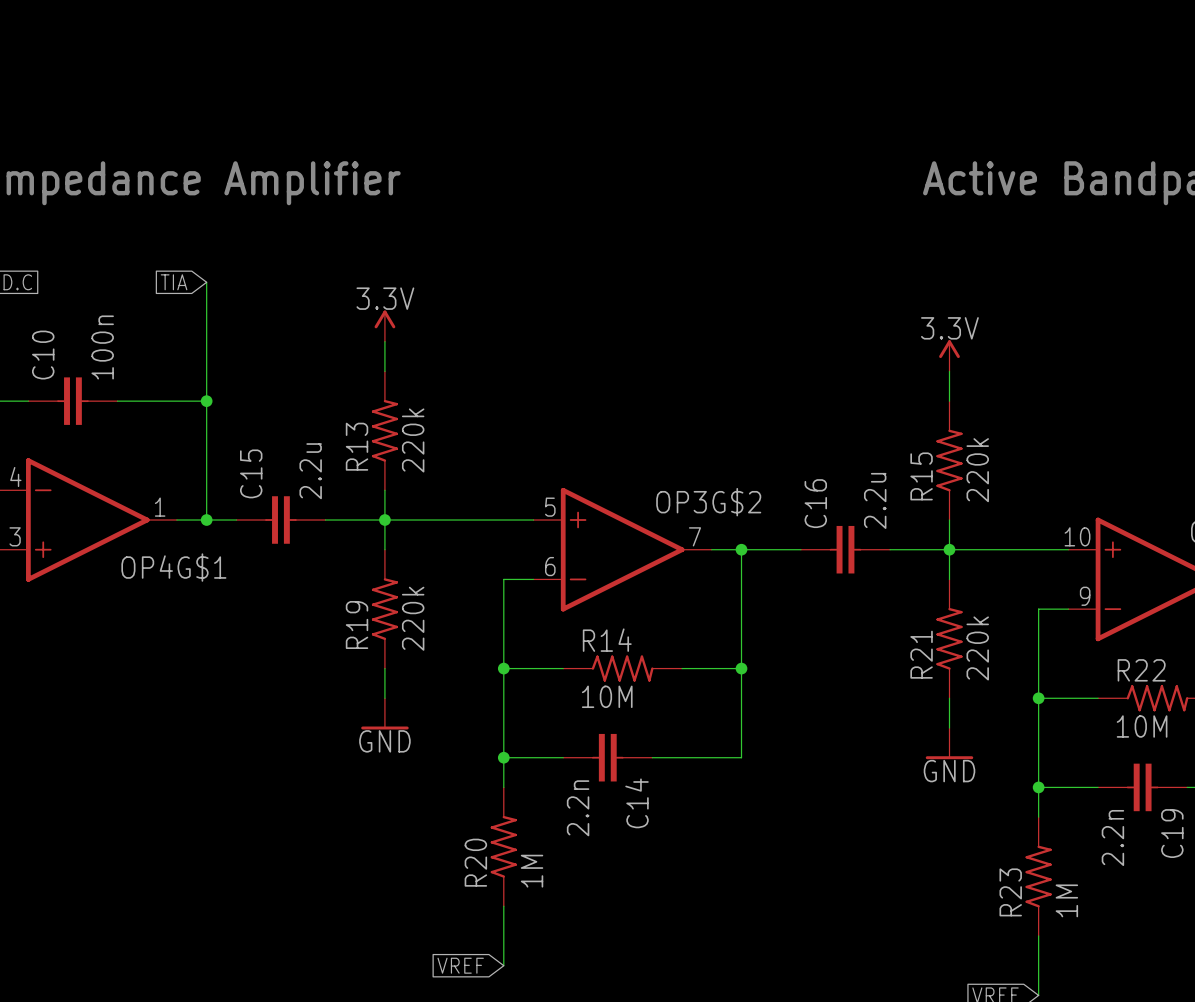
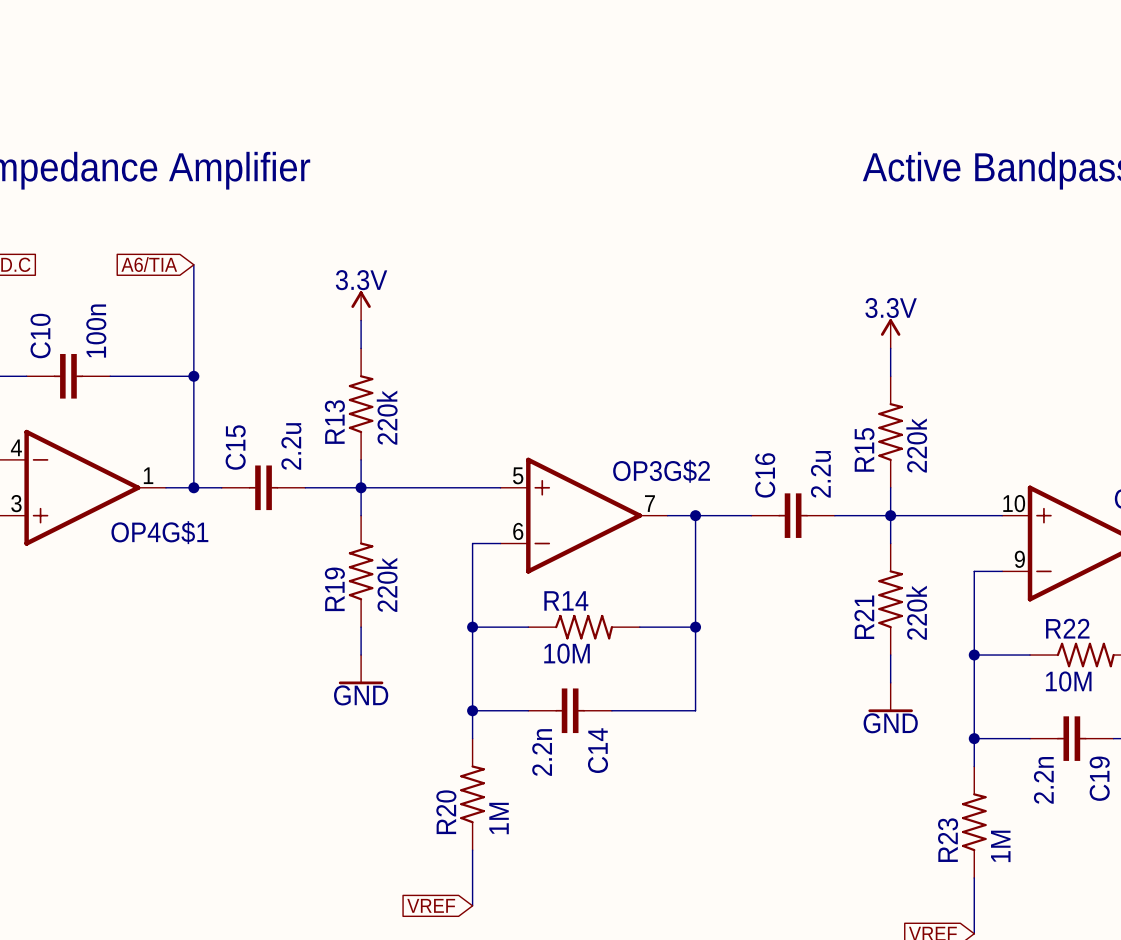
global label: TIA (174, 282) -> A6/TIA (149, 264)

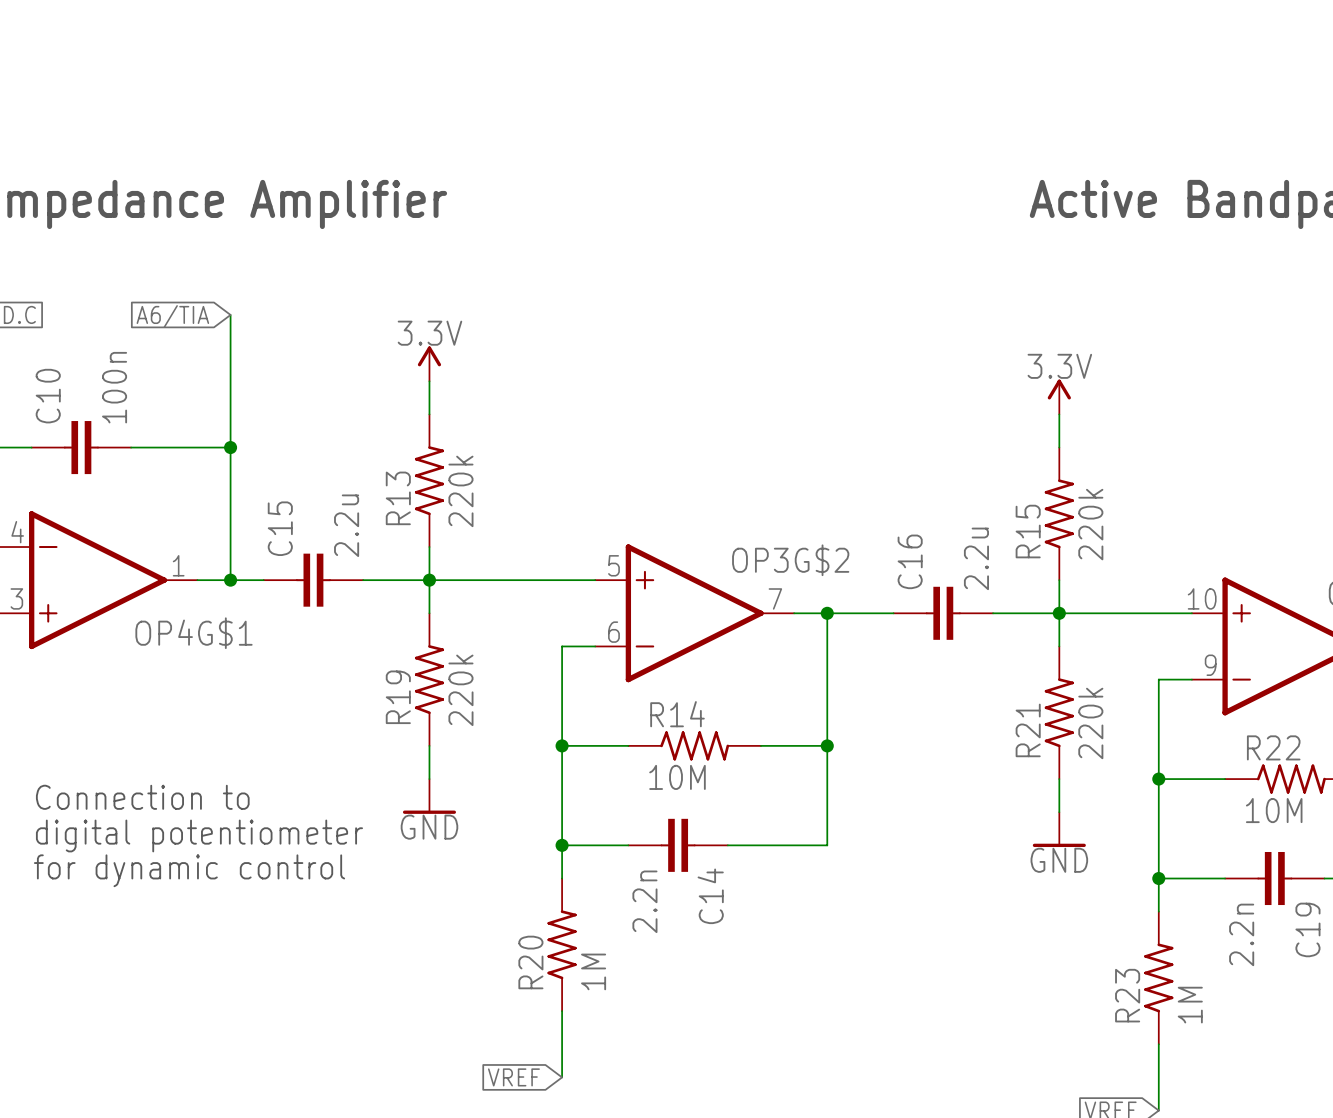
text: none -> Connection to (142, 797)
text: none -> digital potentiometer (199, 835)
text: none -> for dynamic control (189, 870)

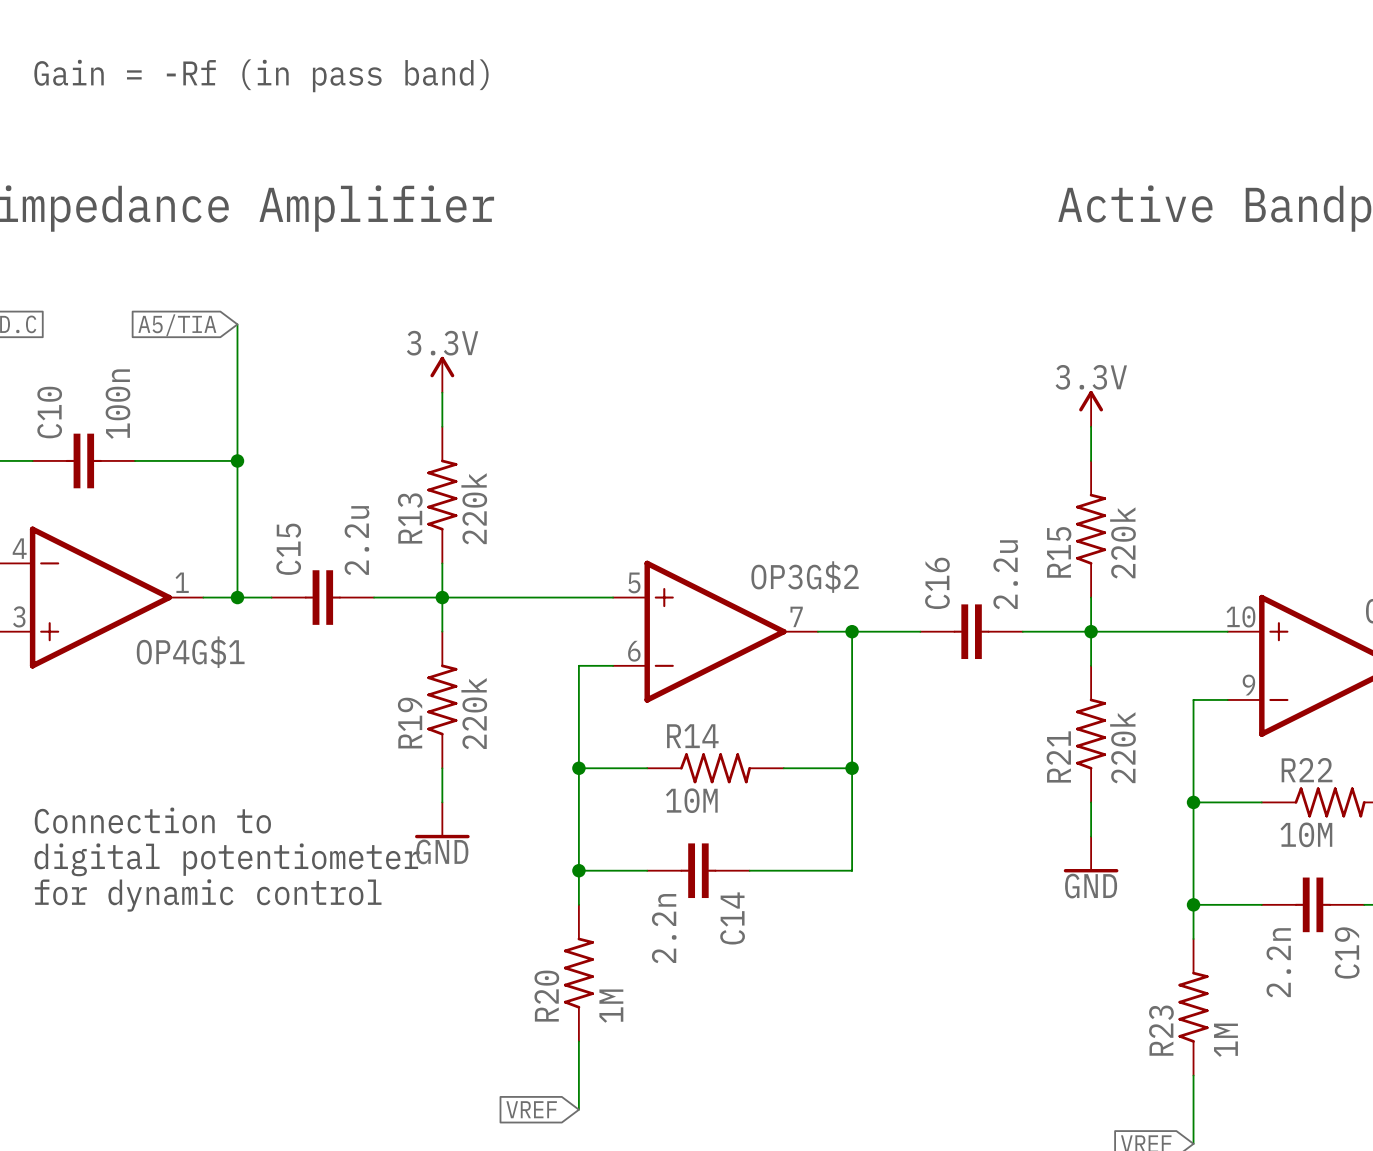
text: none -> Gain = -Rf (in pass band) (261, 75)
global label: A6/TIA (172, 316) -> A5/TIA (177, 325)

